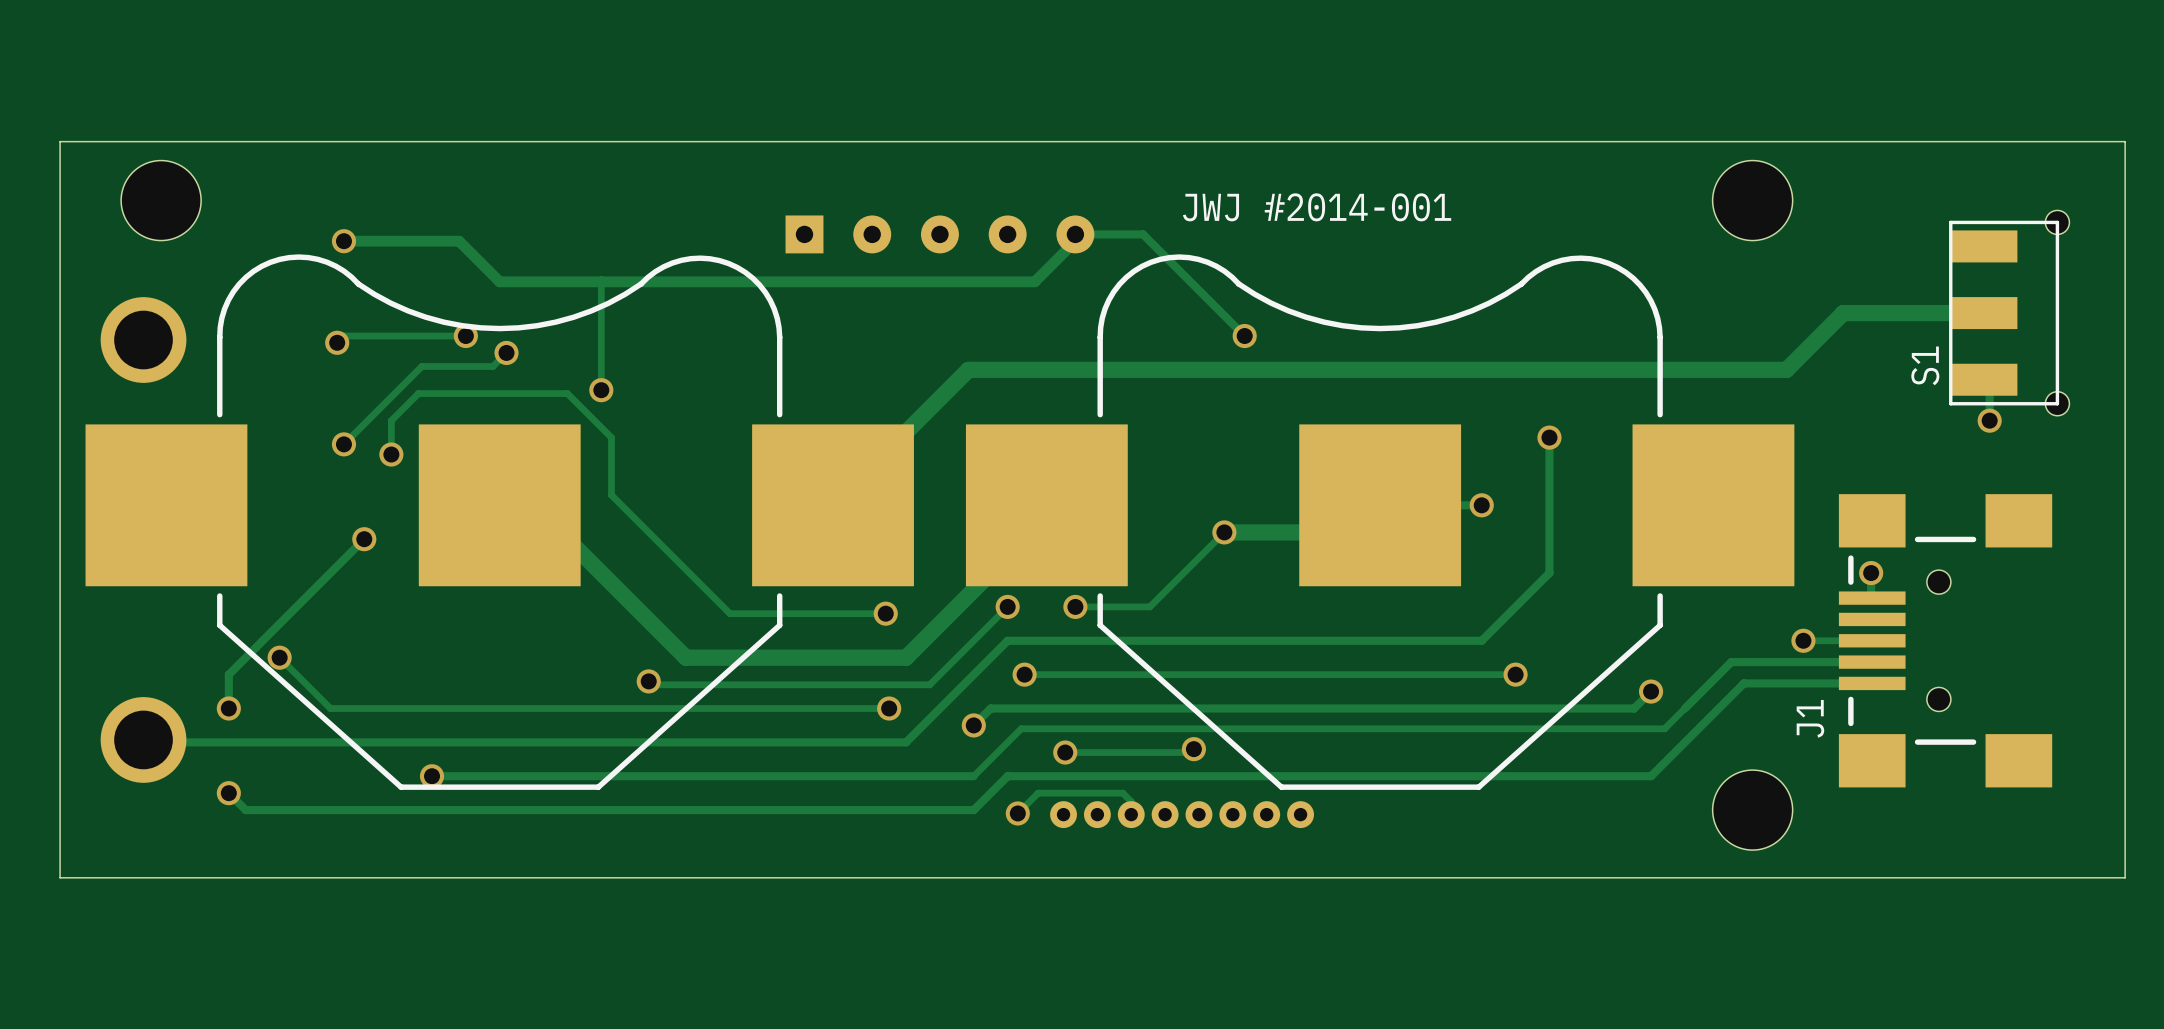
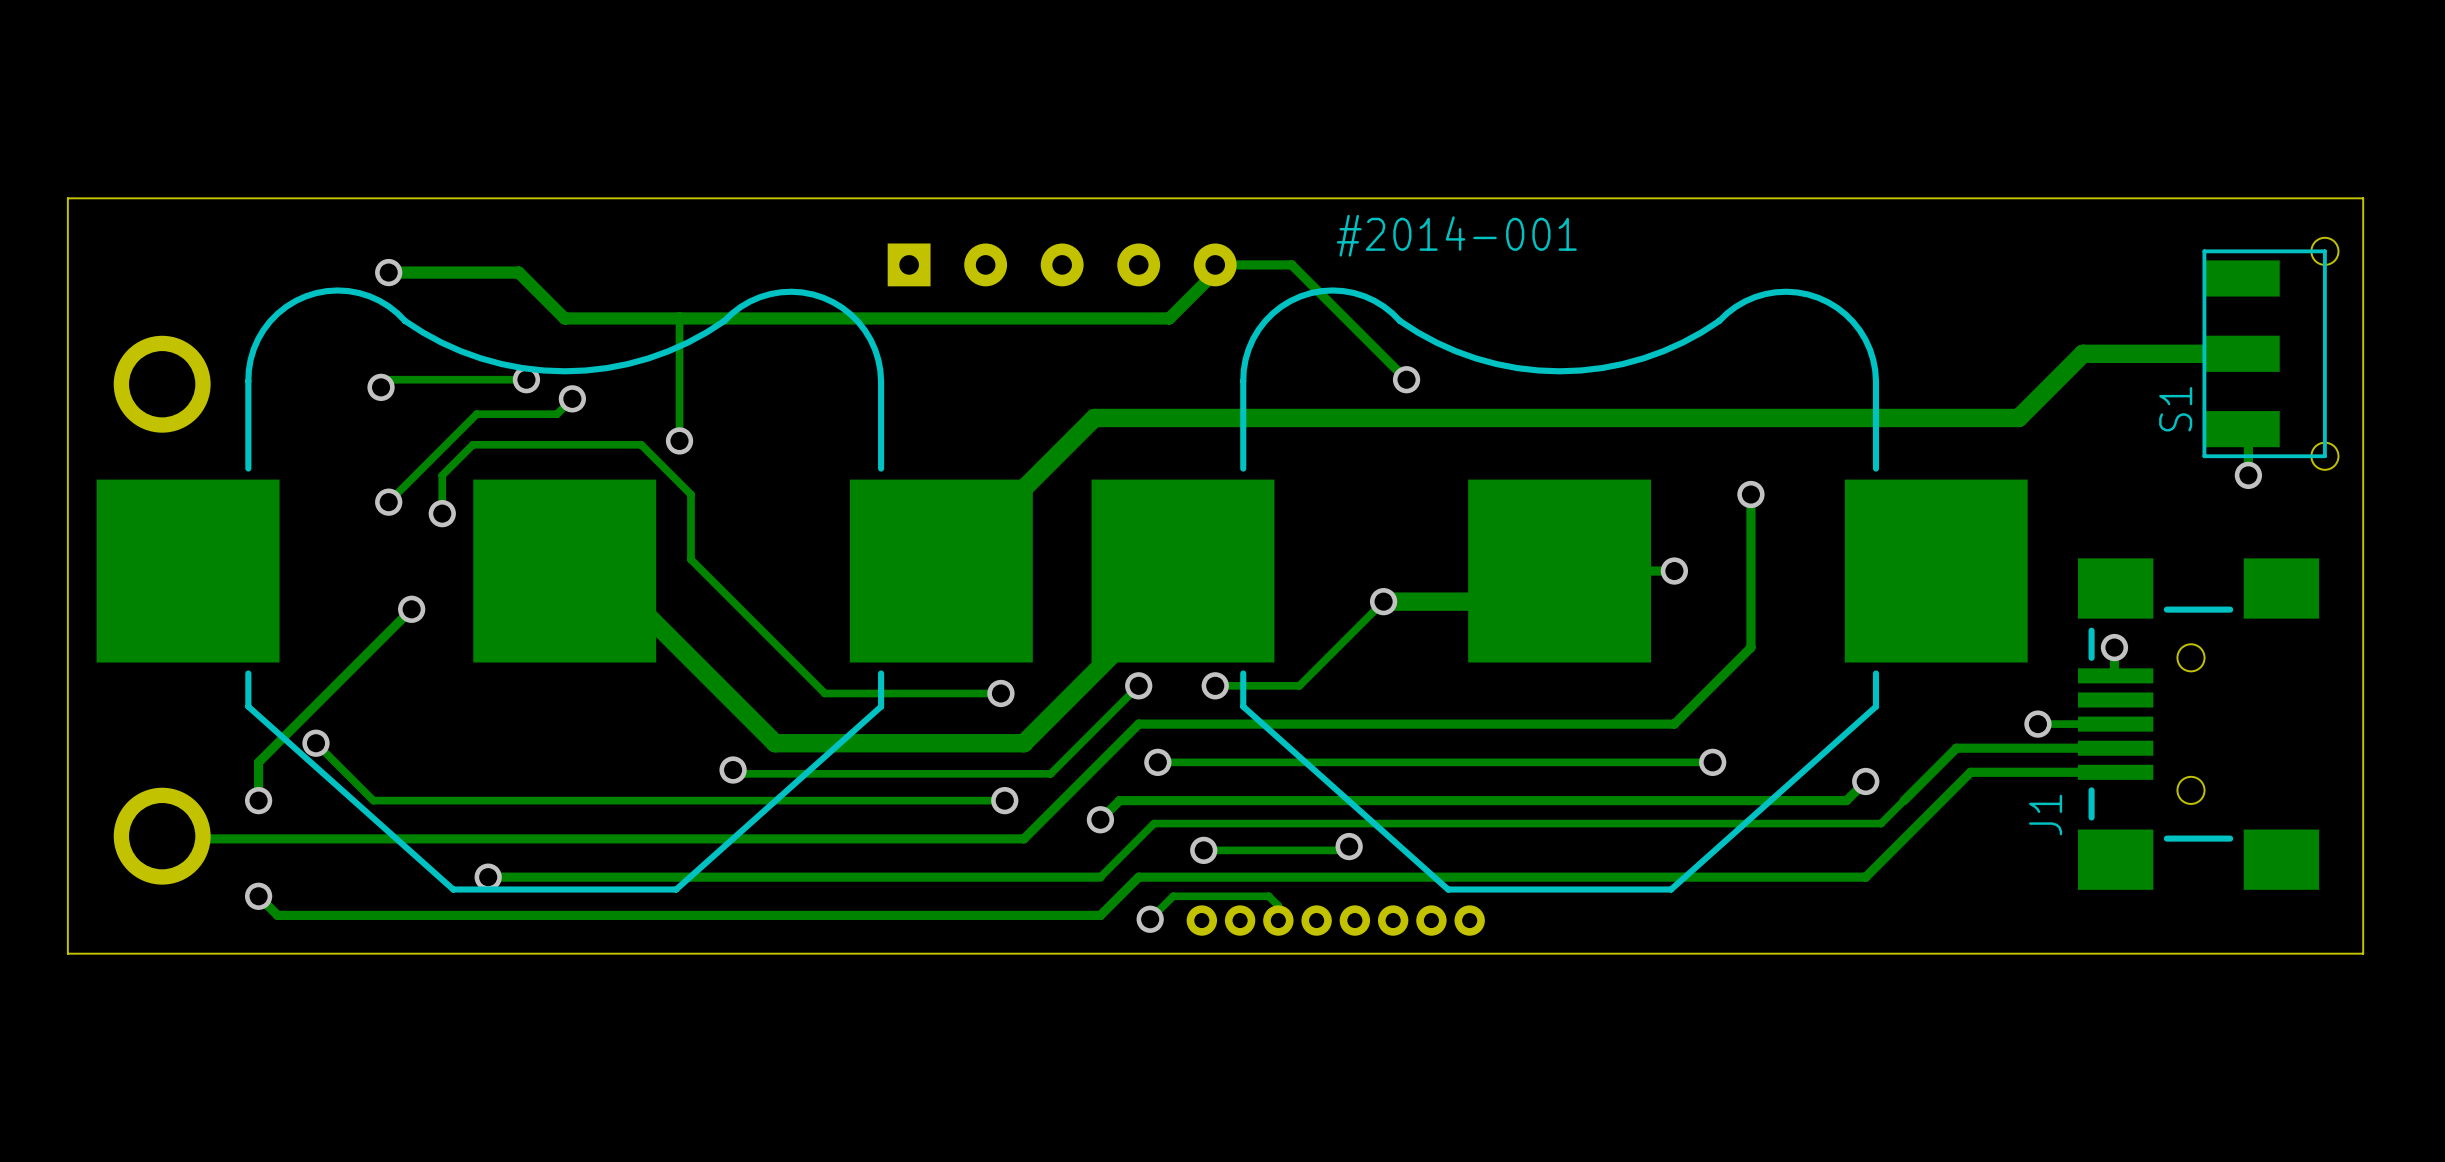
board edge: (60, 175) (60, 141) (2125, 141) (2125, 877) (60, 877) (60, 843) -> (67, 198) (2363, 198) (2363, 953) (67, 953)
hole: (161, 200) -> none
hole: (1752, 200) -> none
text: JWJ #2014-001 (1317, 207) -> #2014-001 (1456, 235)
hole: (1752, 810) -> none

